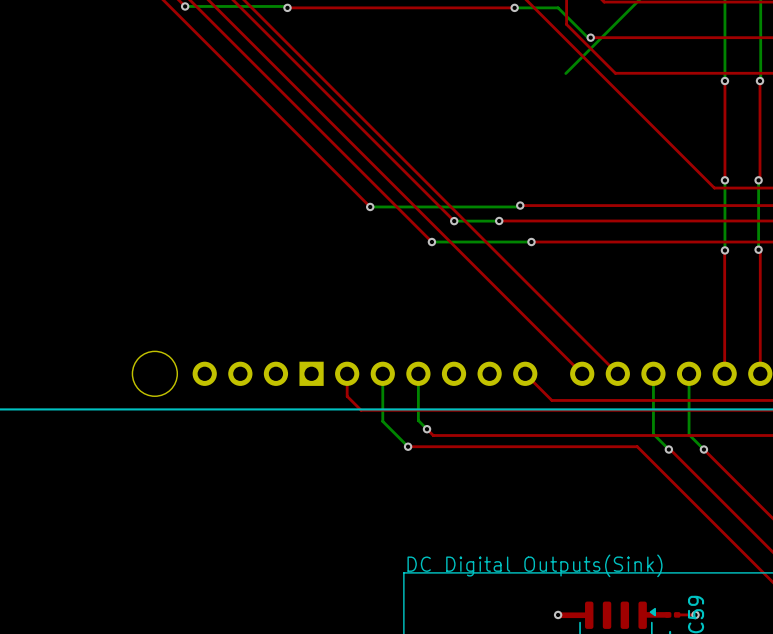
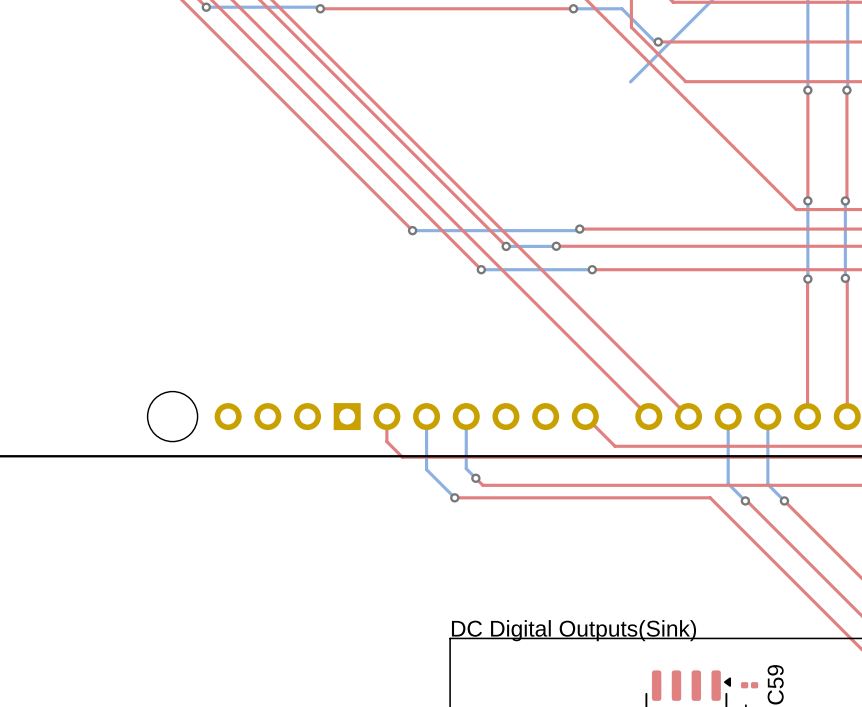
top track: (558, 614) (589, 615) -> none
via: (558, 614) -> none
top track: (668, 614) (642, 615) -> none
top track: (677, 614) (695, 614) -> none
via: (695, 614) -> none

